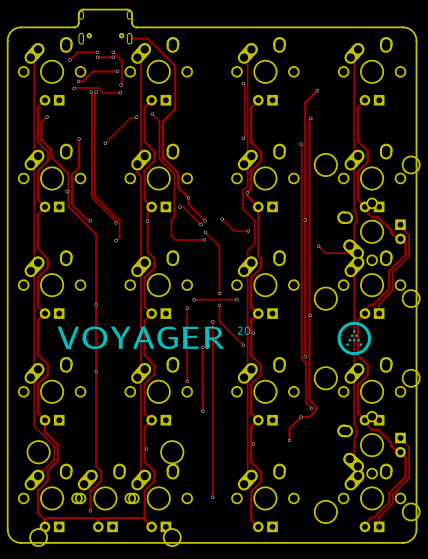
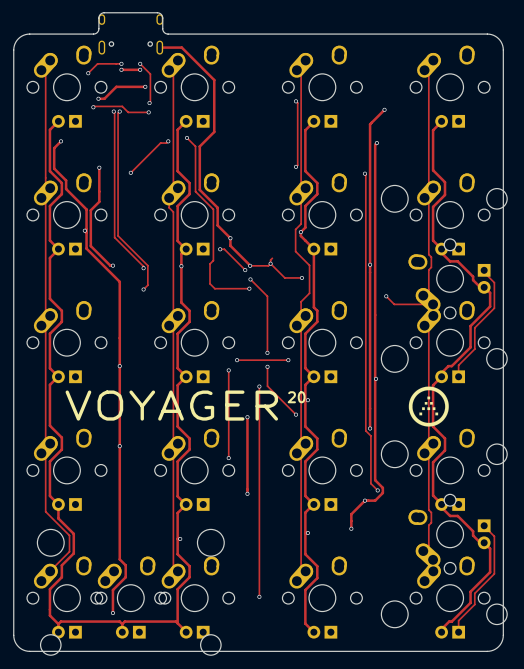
track: none -> (272, 258) (268, 265) (250, 265)

